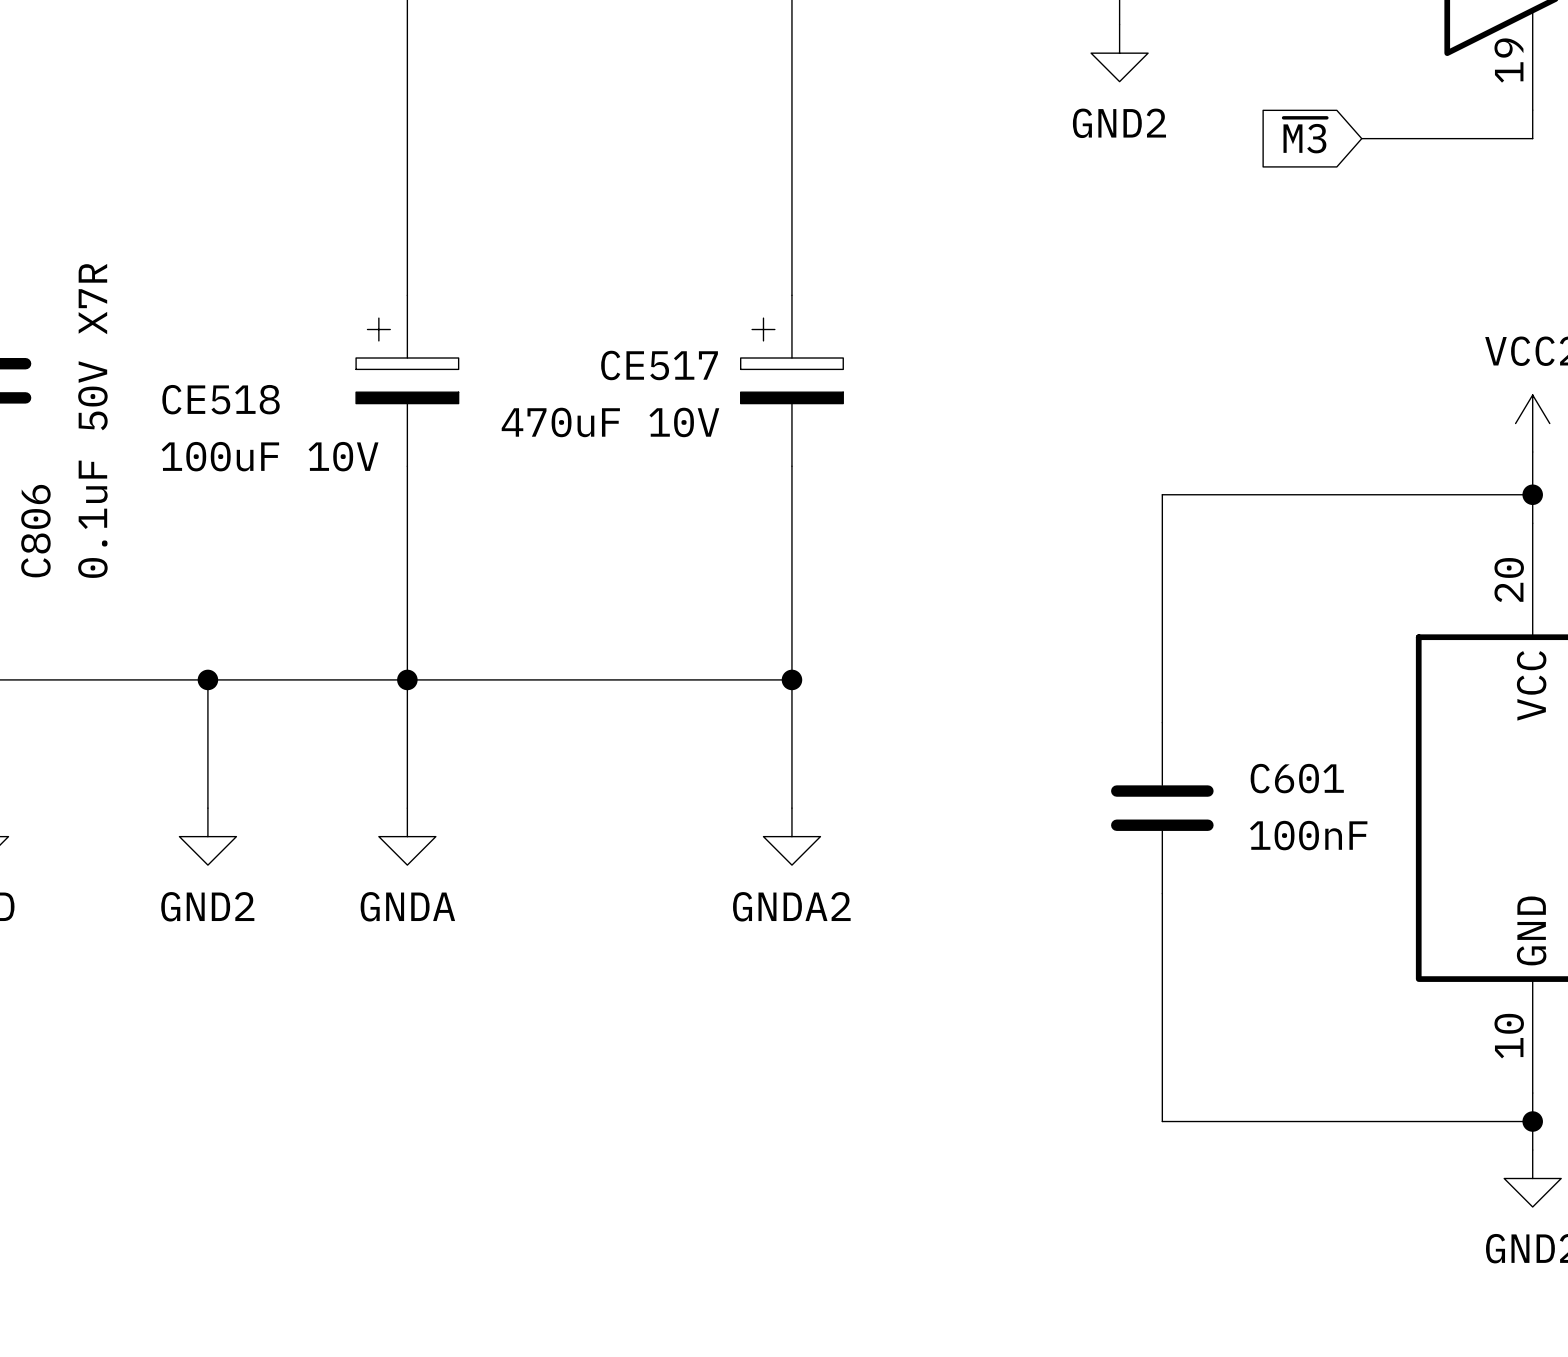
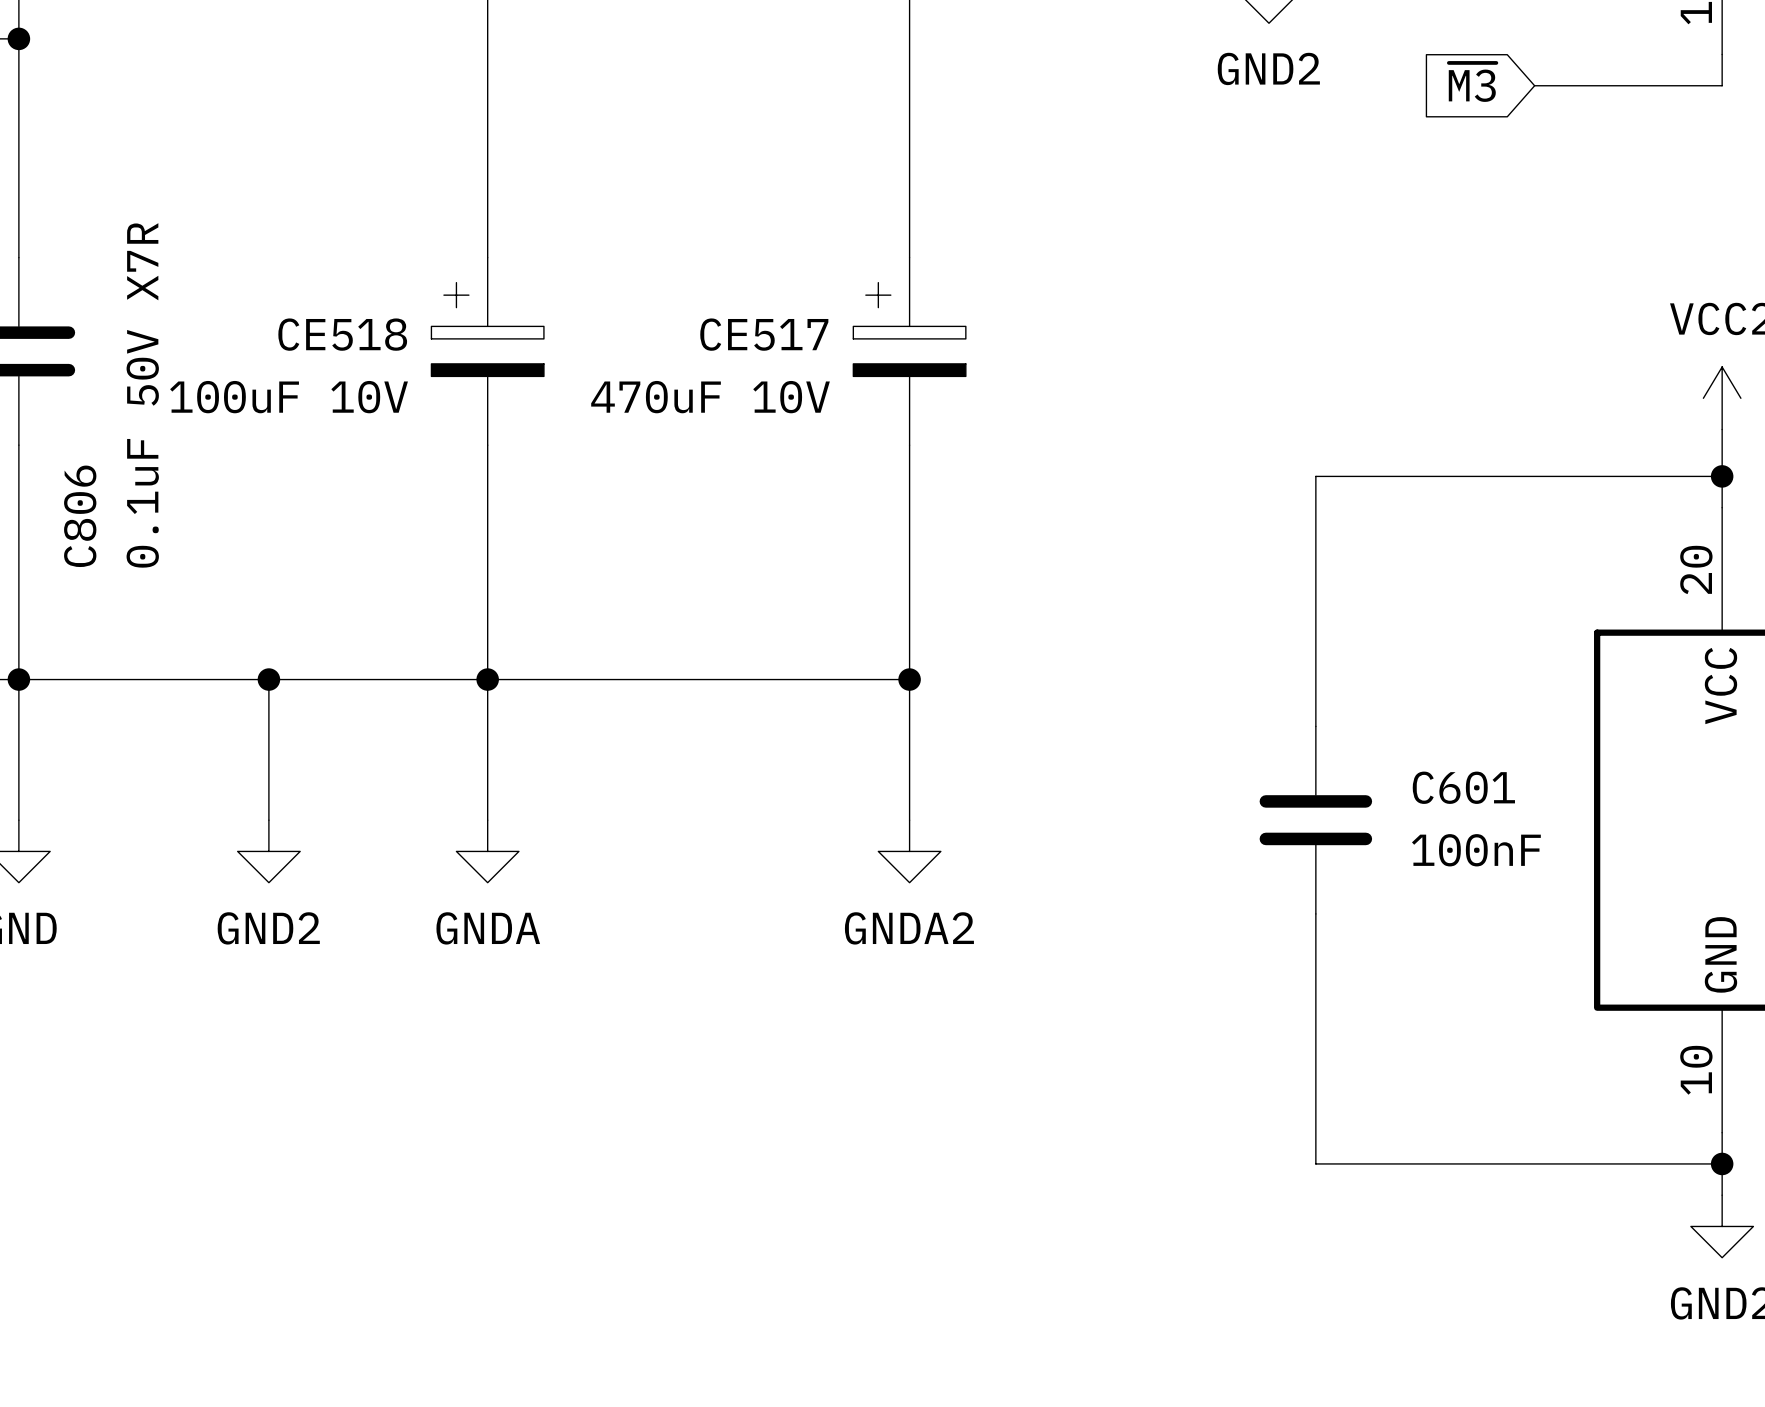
CE518 name position: CE518 (221, 399) -> CE518 (342, 334)
CE518 value position: 100uF 10V (270, 456) -> 100uF 10V (289, 397)

